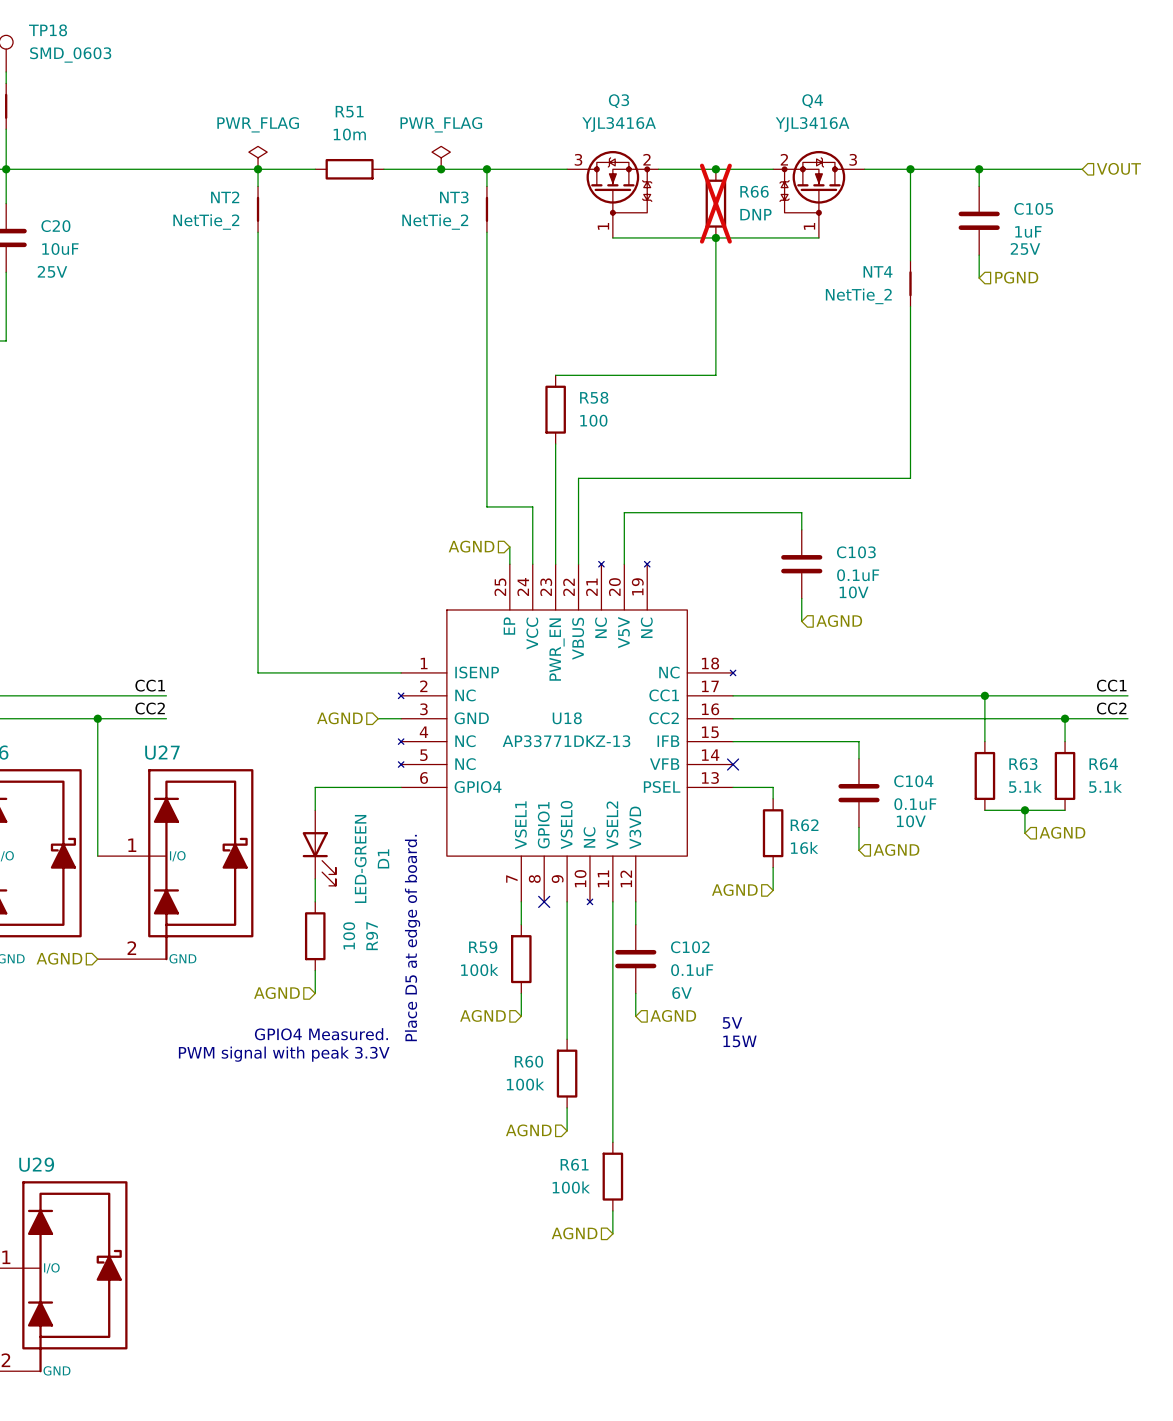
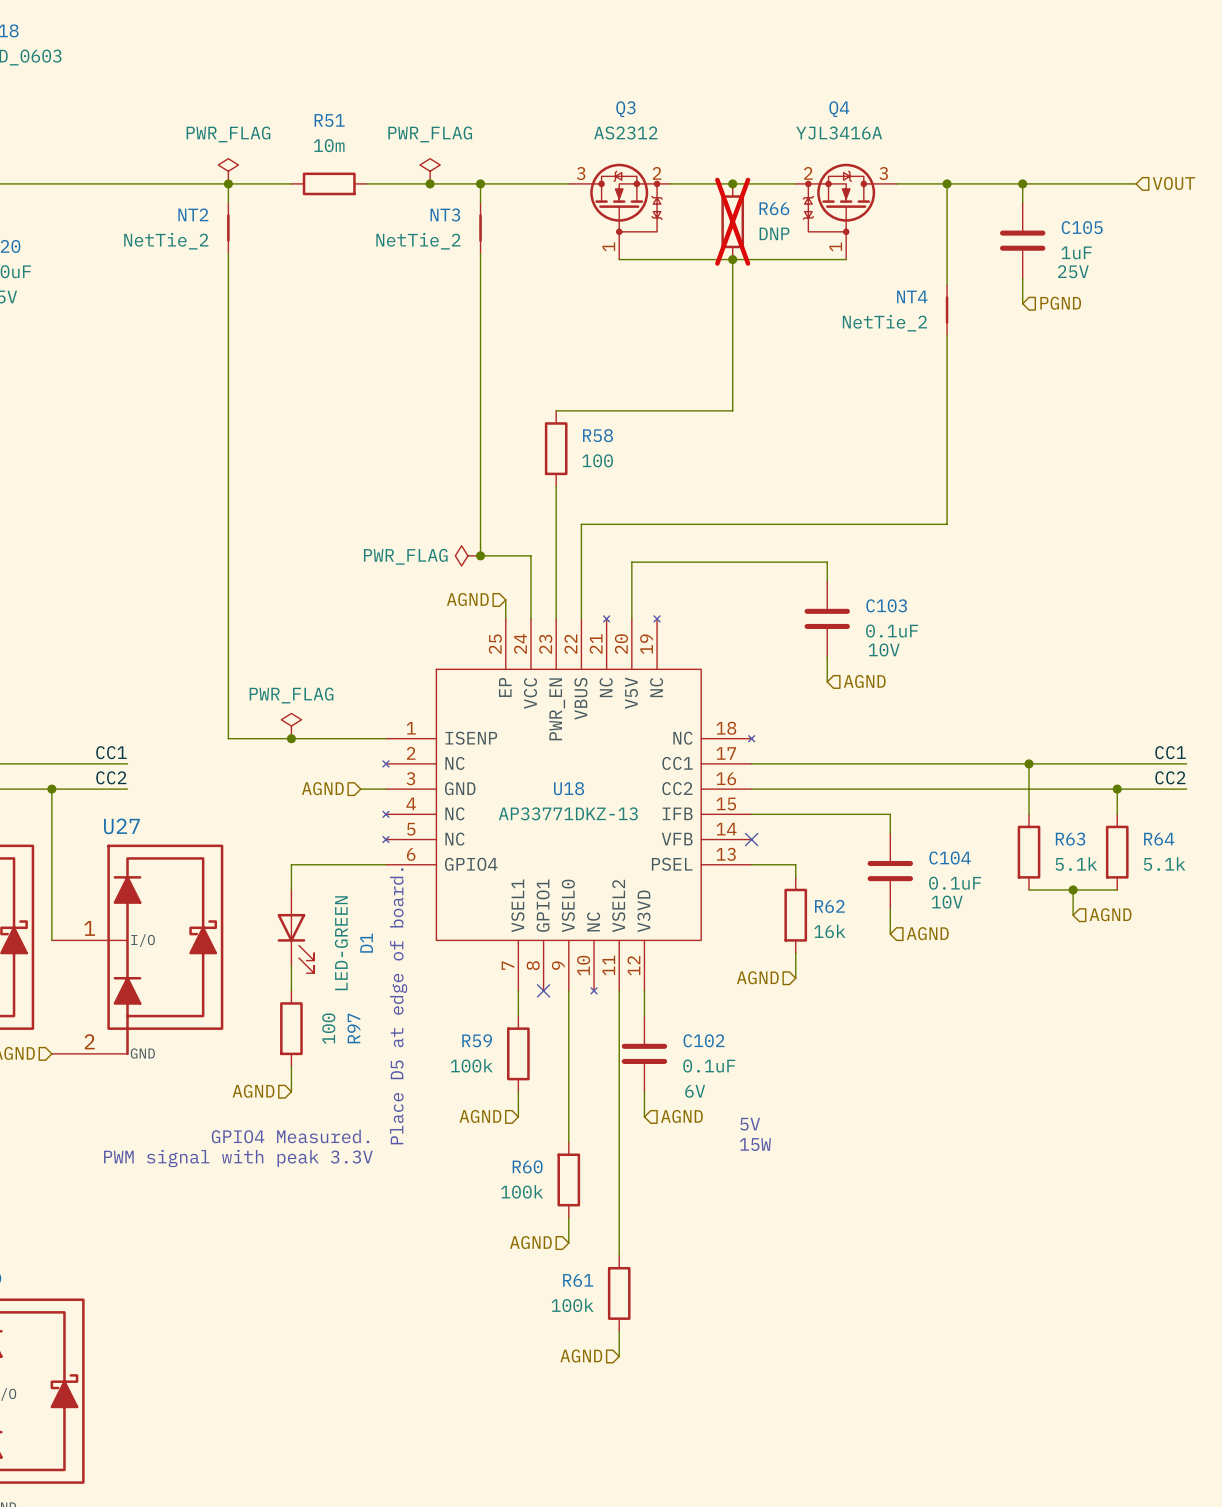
Q3 value: YJL3416A (619, 124) -> AS2312 (625, 133)
power symbol: none -> PWR_FLAG (467, 555)
junction: none -> (480, 555)
power symbol: none -> PWR_FLAG (291, 726)
junction: none -> (291, 738)

